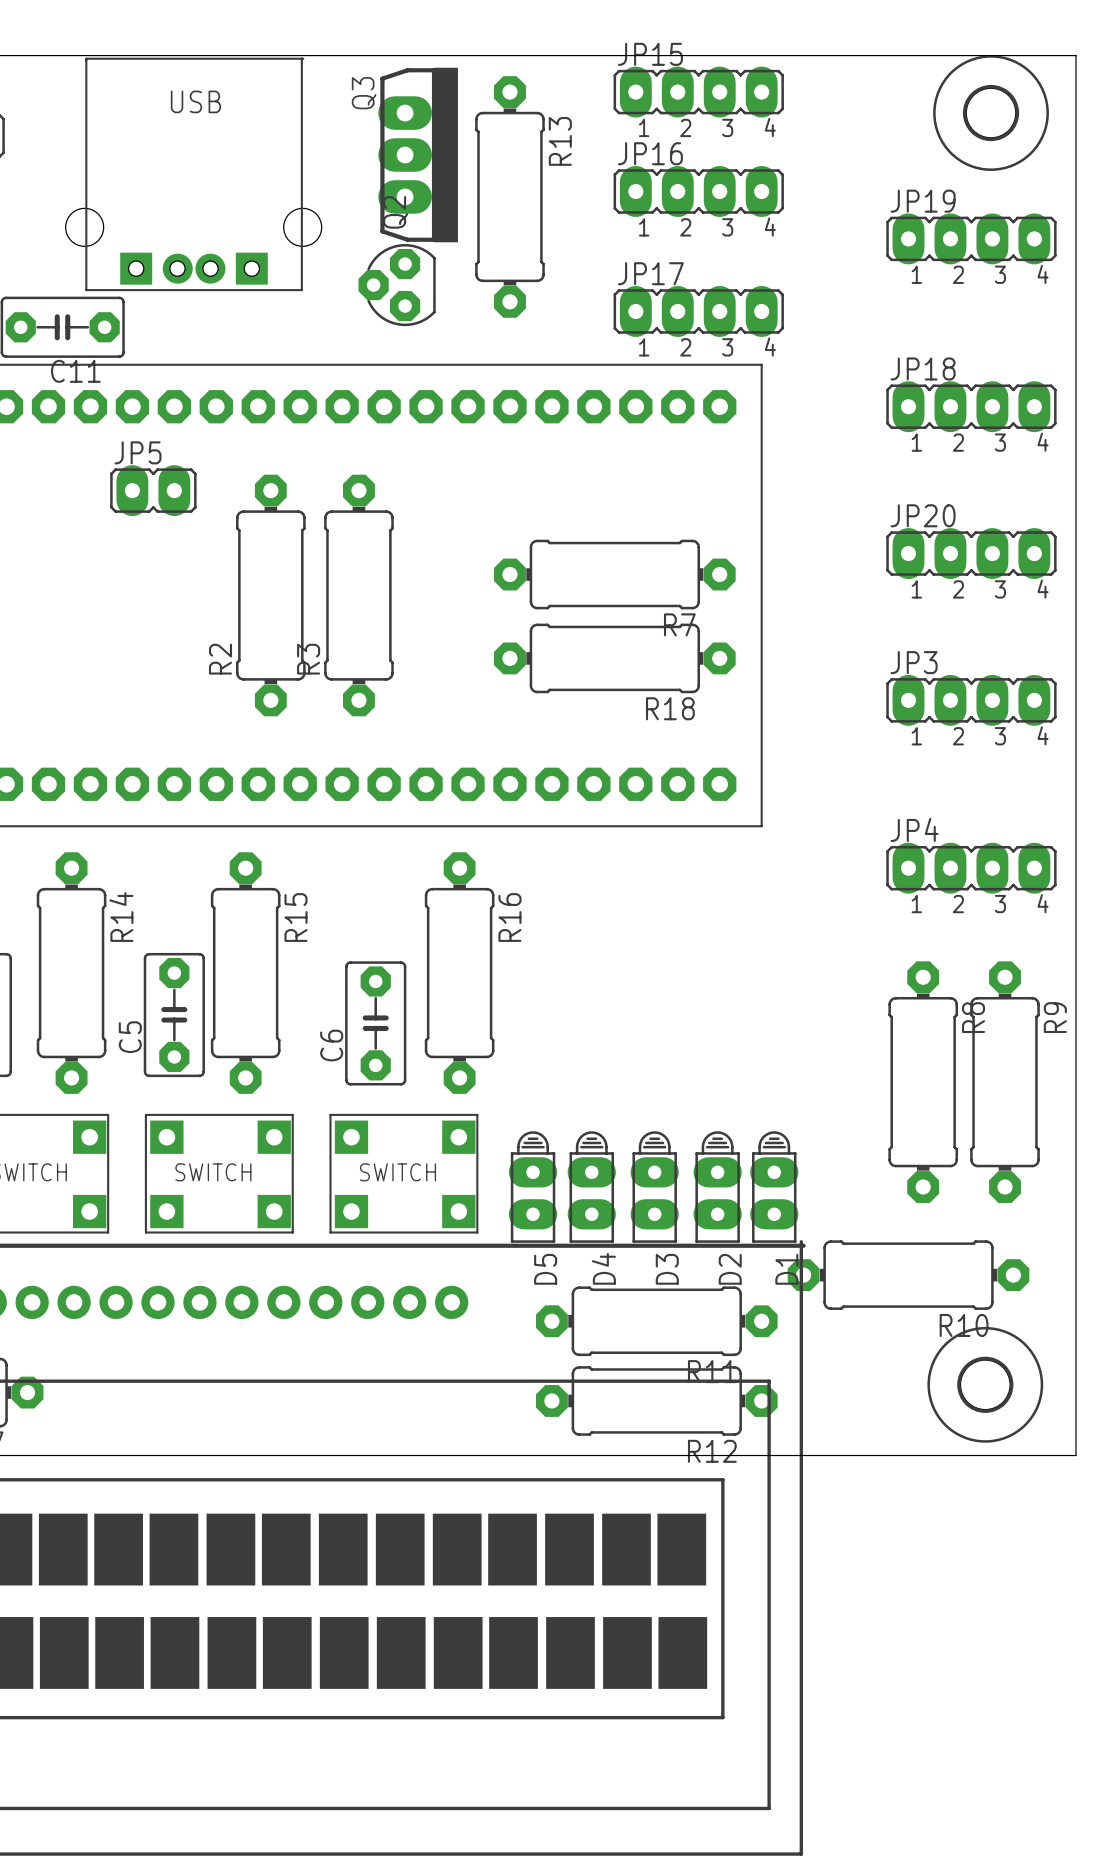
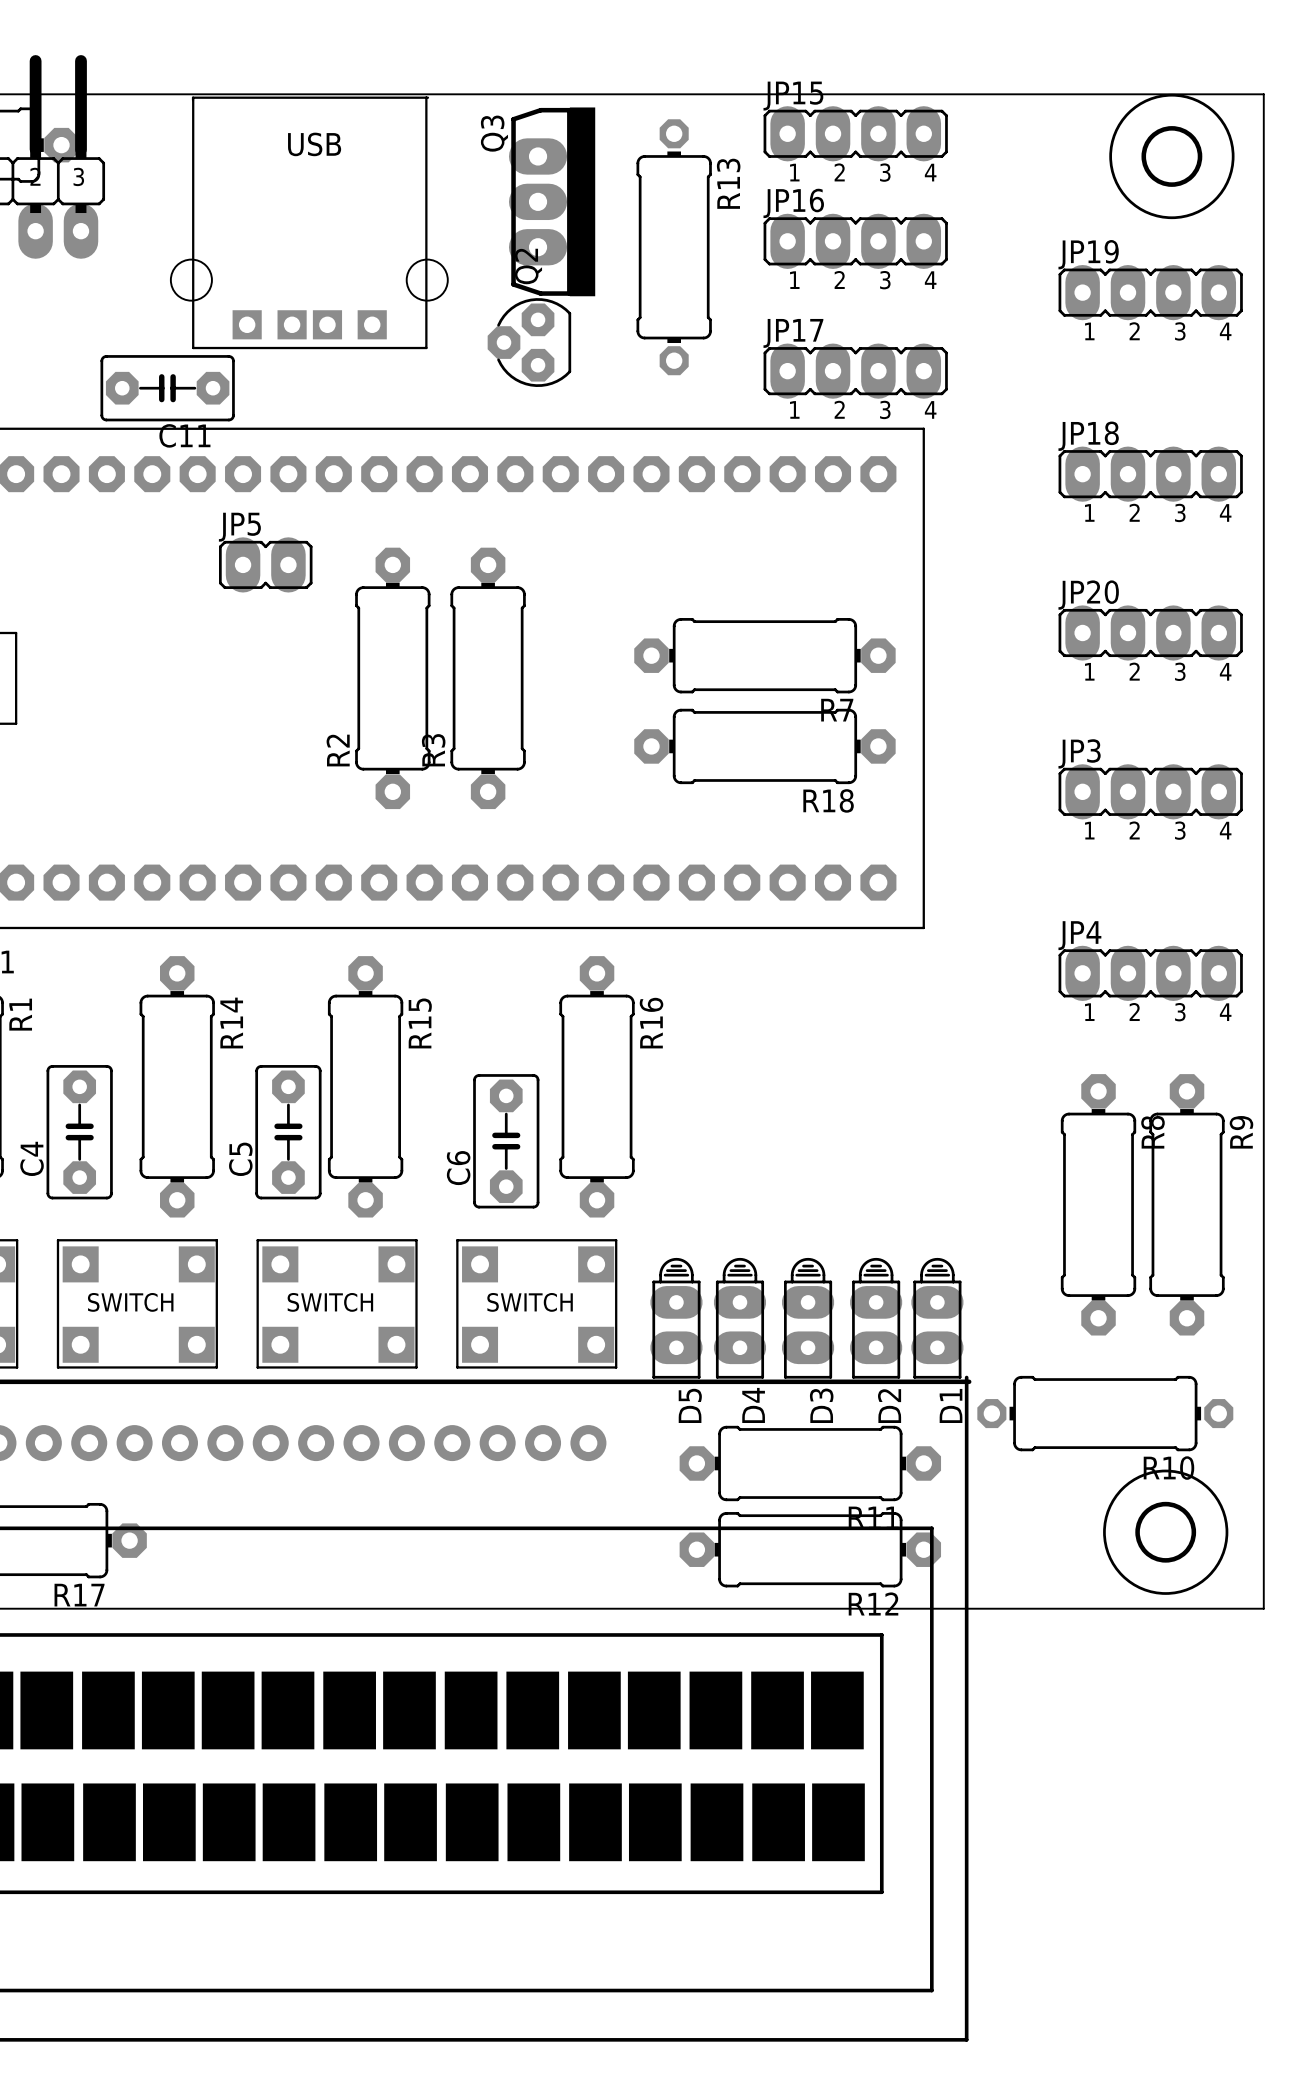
part footprint: [65, 57, 322, 292] -> [170, 96, 448, 350]
R13 footprint: [475, 76, 545, 318] -> [636, 119, 712, 376]
R10 footprint: [787, 1240, 1030, 1310] -> [977, 1375, 1234, 1452]

